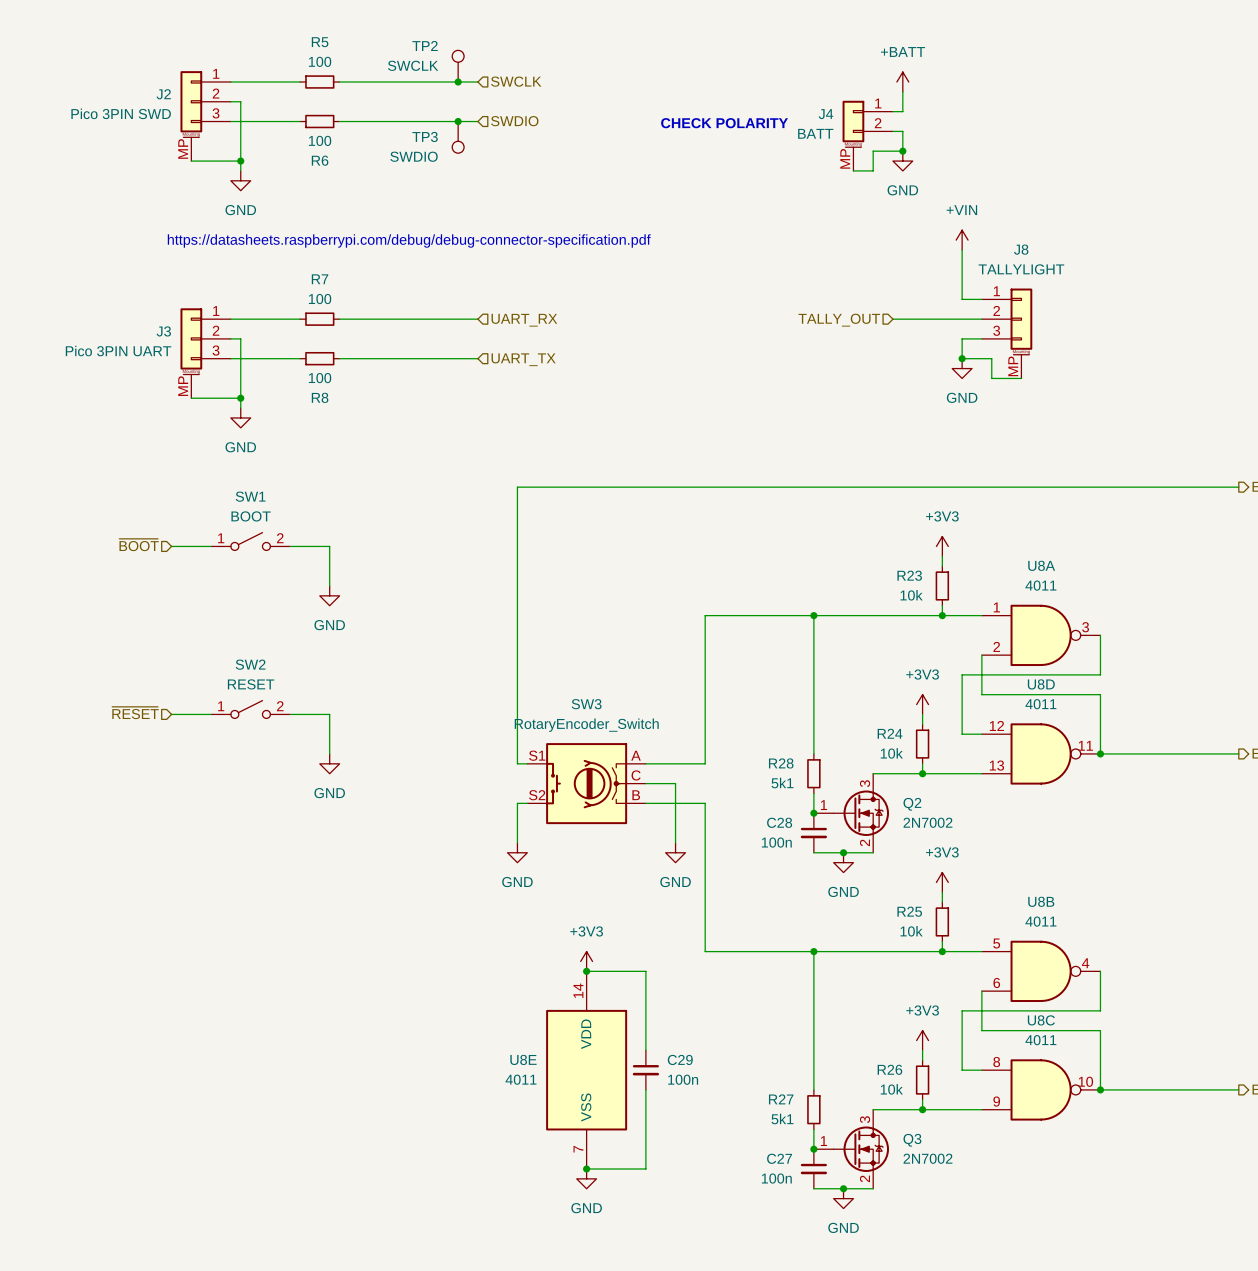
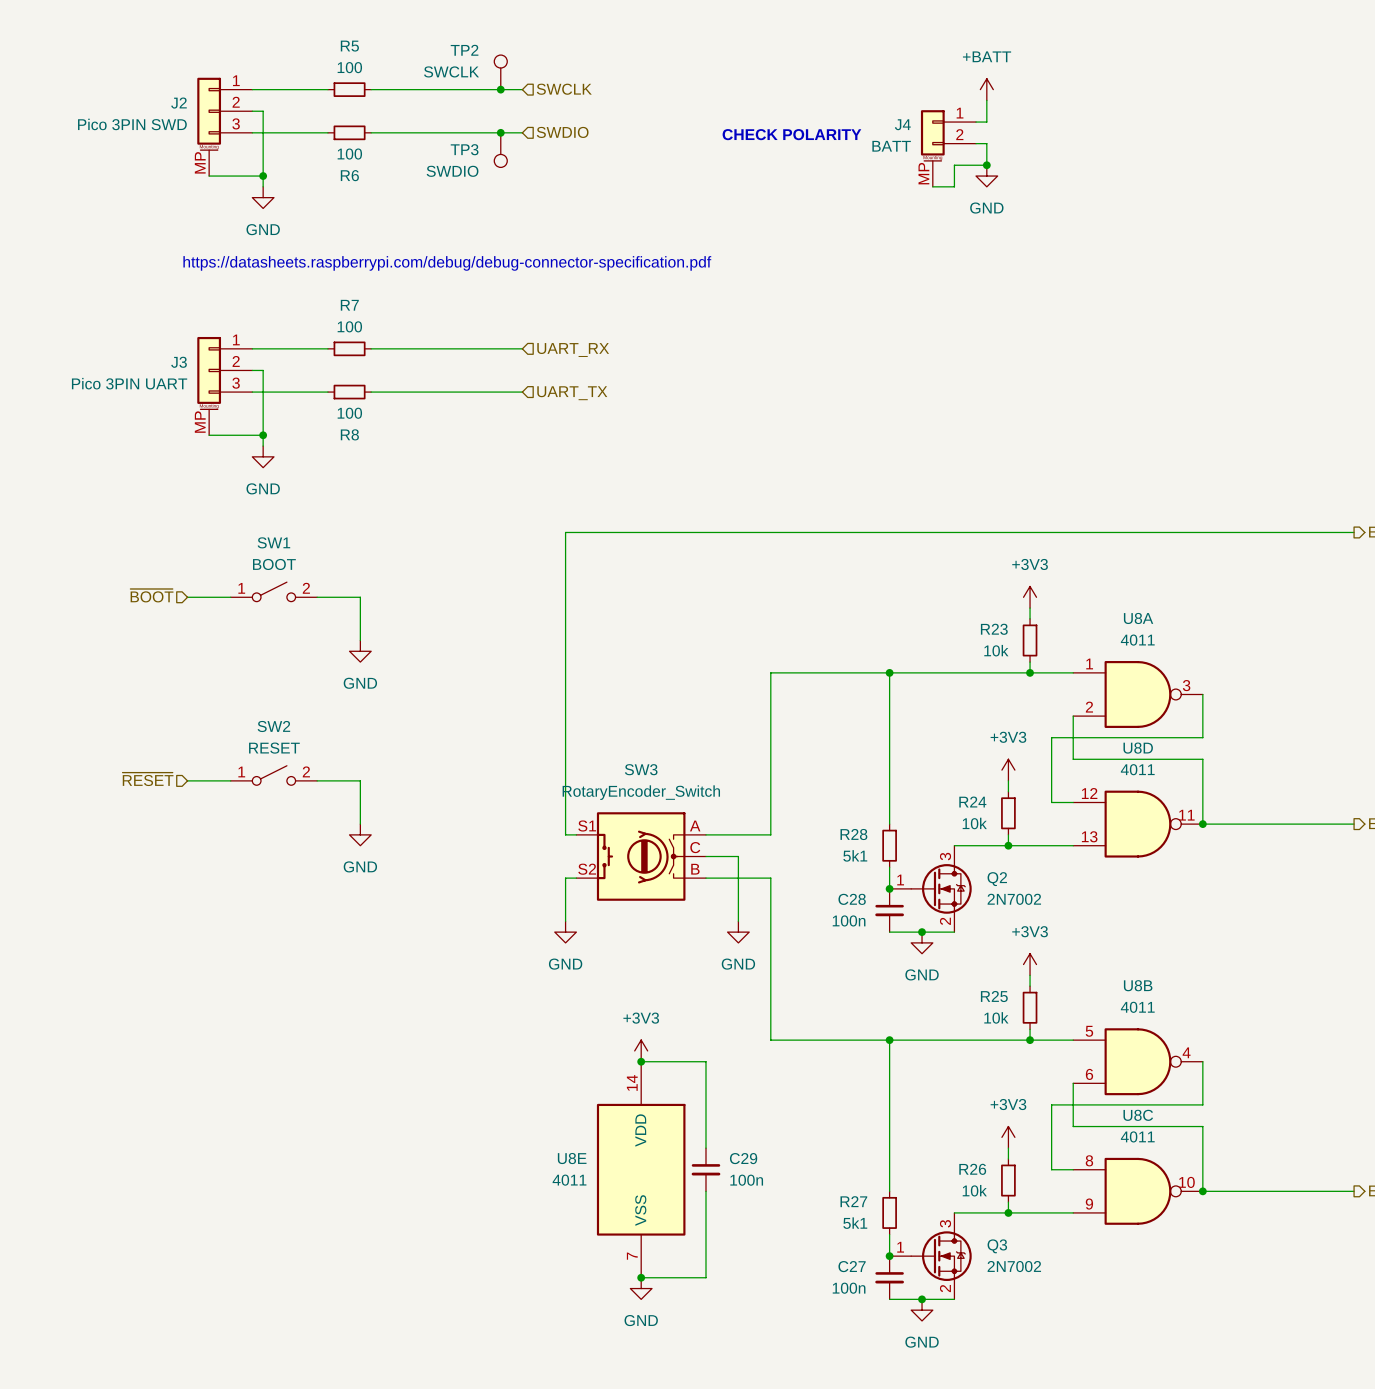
power symbol: +VIN (962, 240) -> none
wire: (962, 249) (962, 299) (981, 299) -> none
wire: (892, 319) (981, 319) -> none
hierarchical label: TALLY_OUT (839, 320) -> none
J8: TALLYLIGHT (1007, 333) -> none
wire: (981, 338) (962, 338) (962, 358) (991, 358) (991, 378) (1021, 378) -> none
junction: (962, 358) -> none
power symbol: GND (962, 368) -> none

